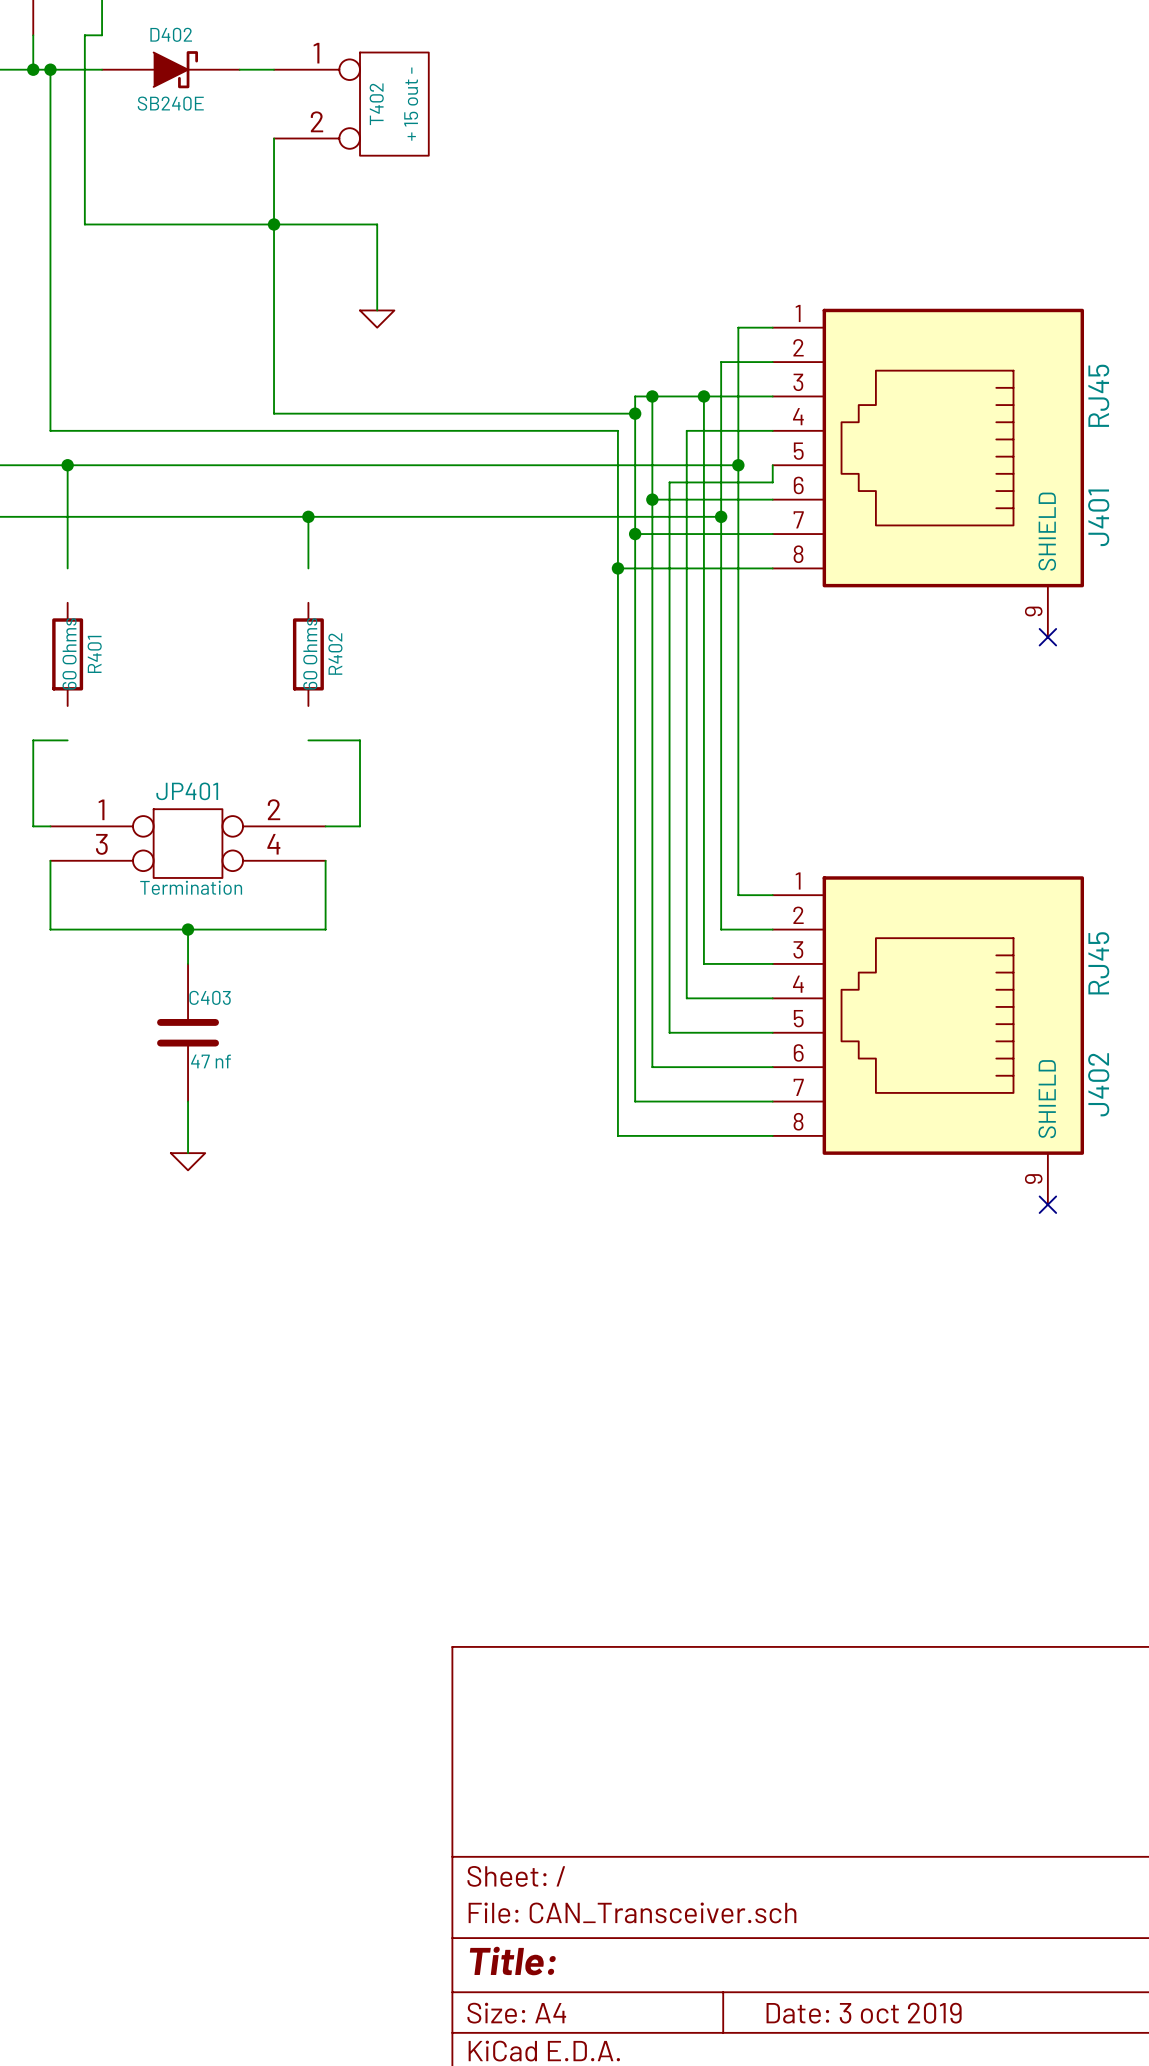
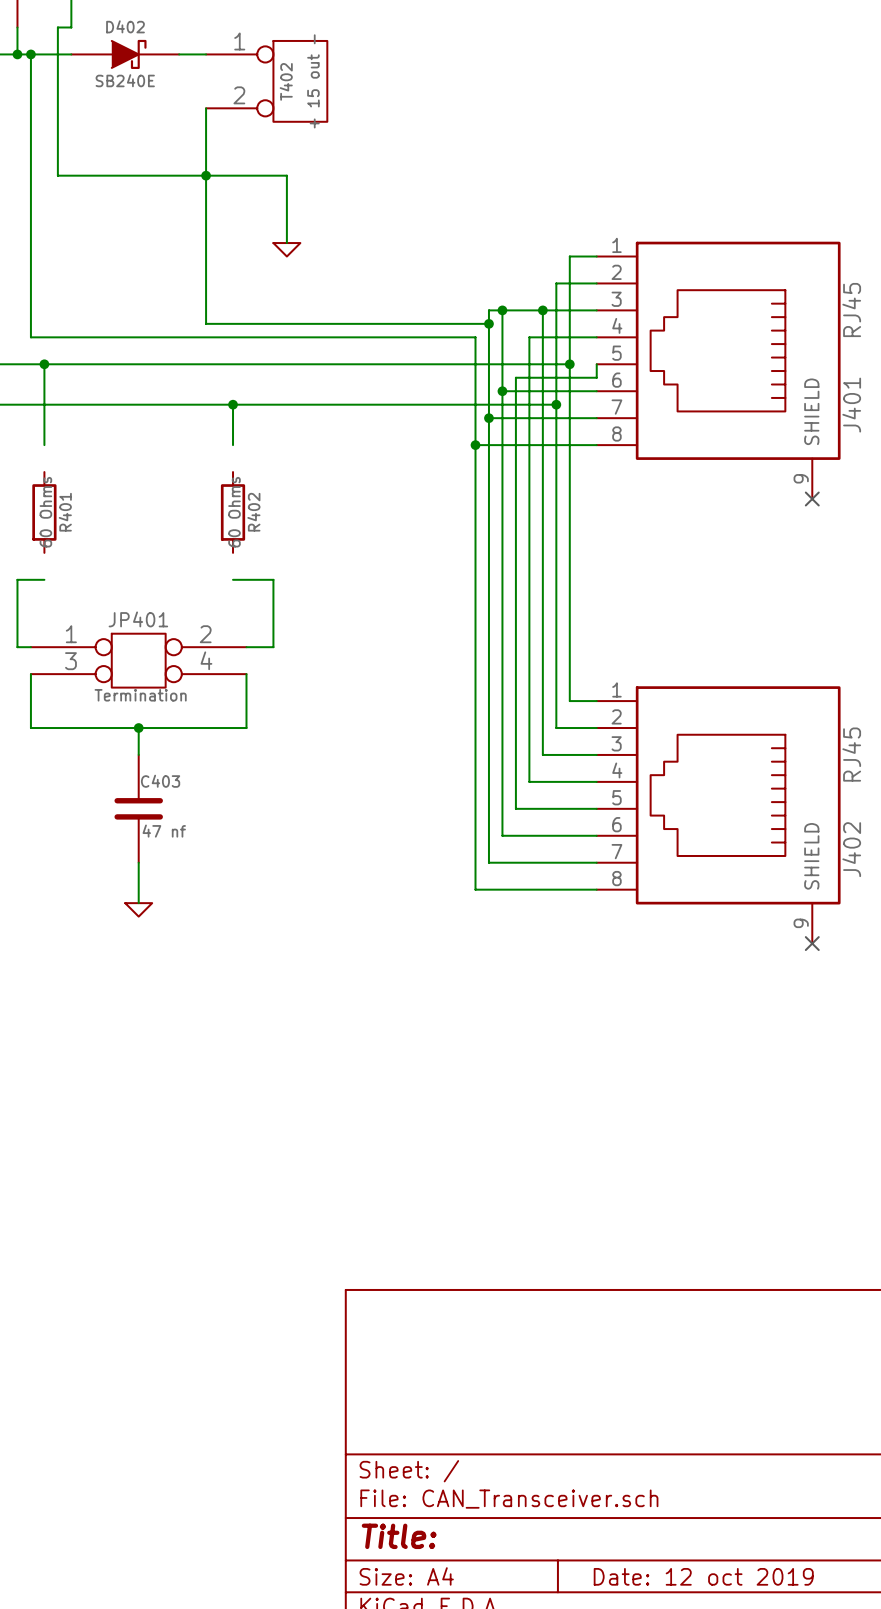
title block: Date: 3 oct 2019 (864, 2013) -> Date: 12 oct 2019 (703, 1576)

